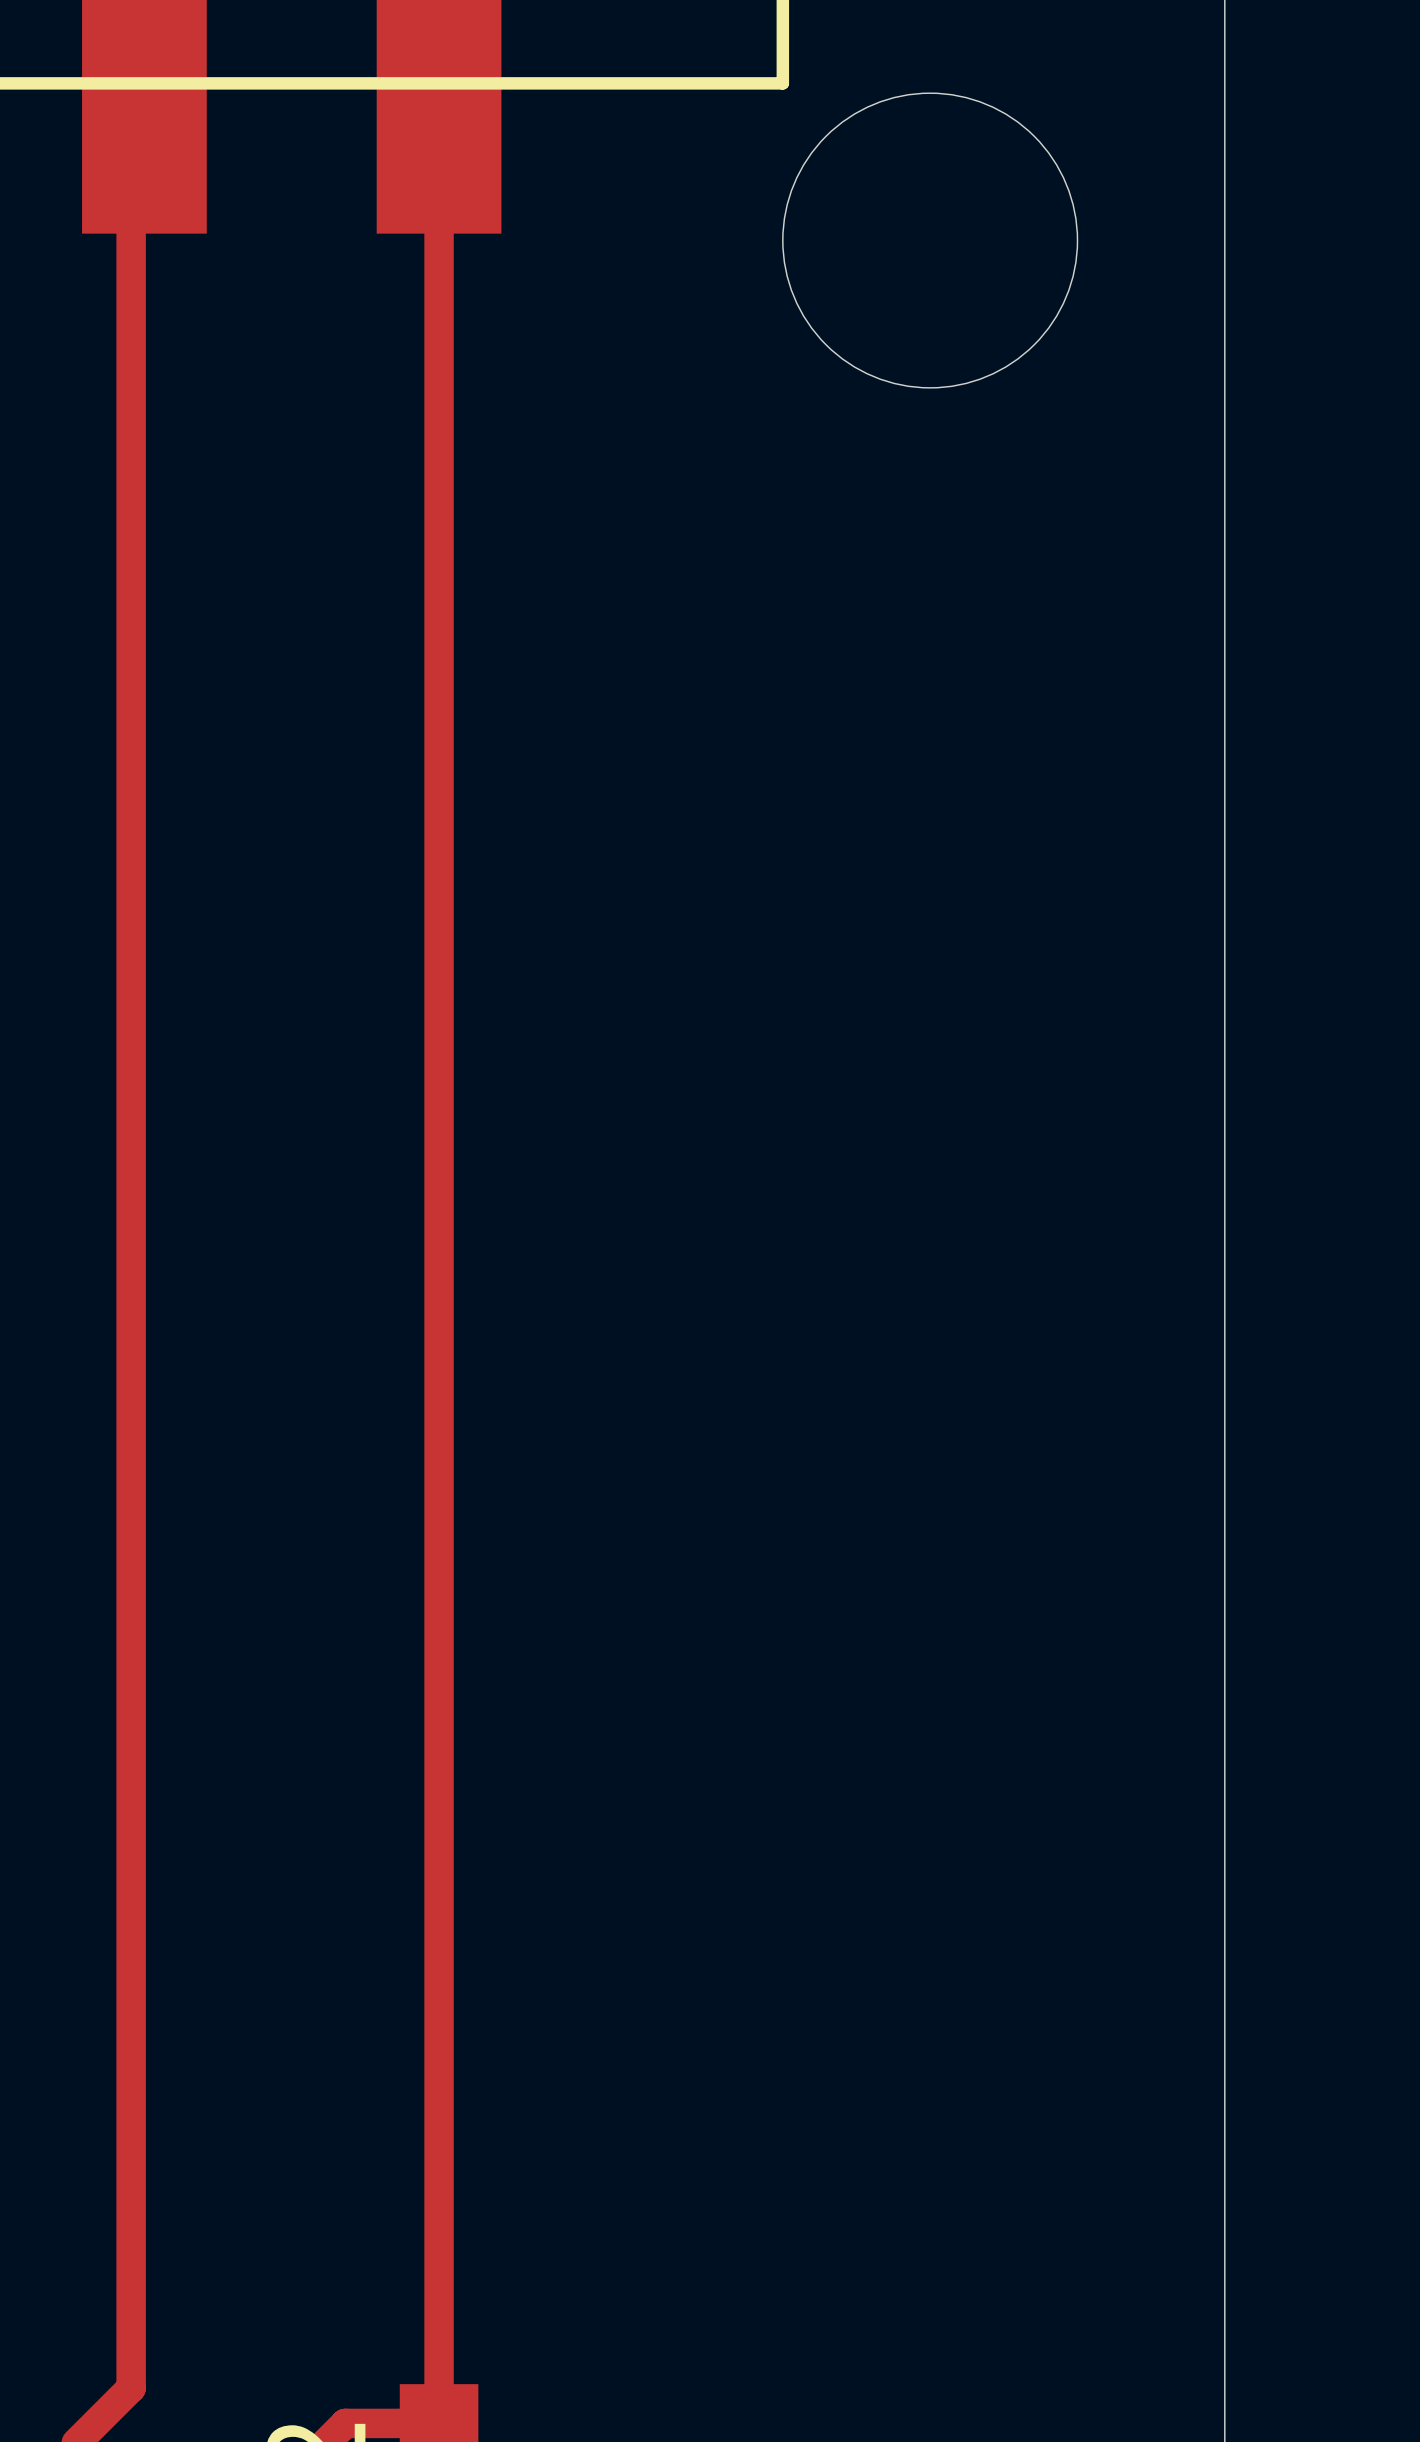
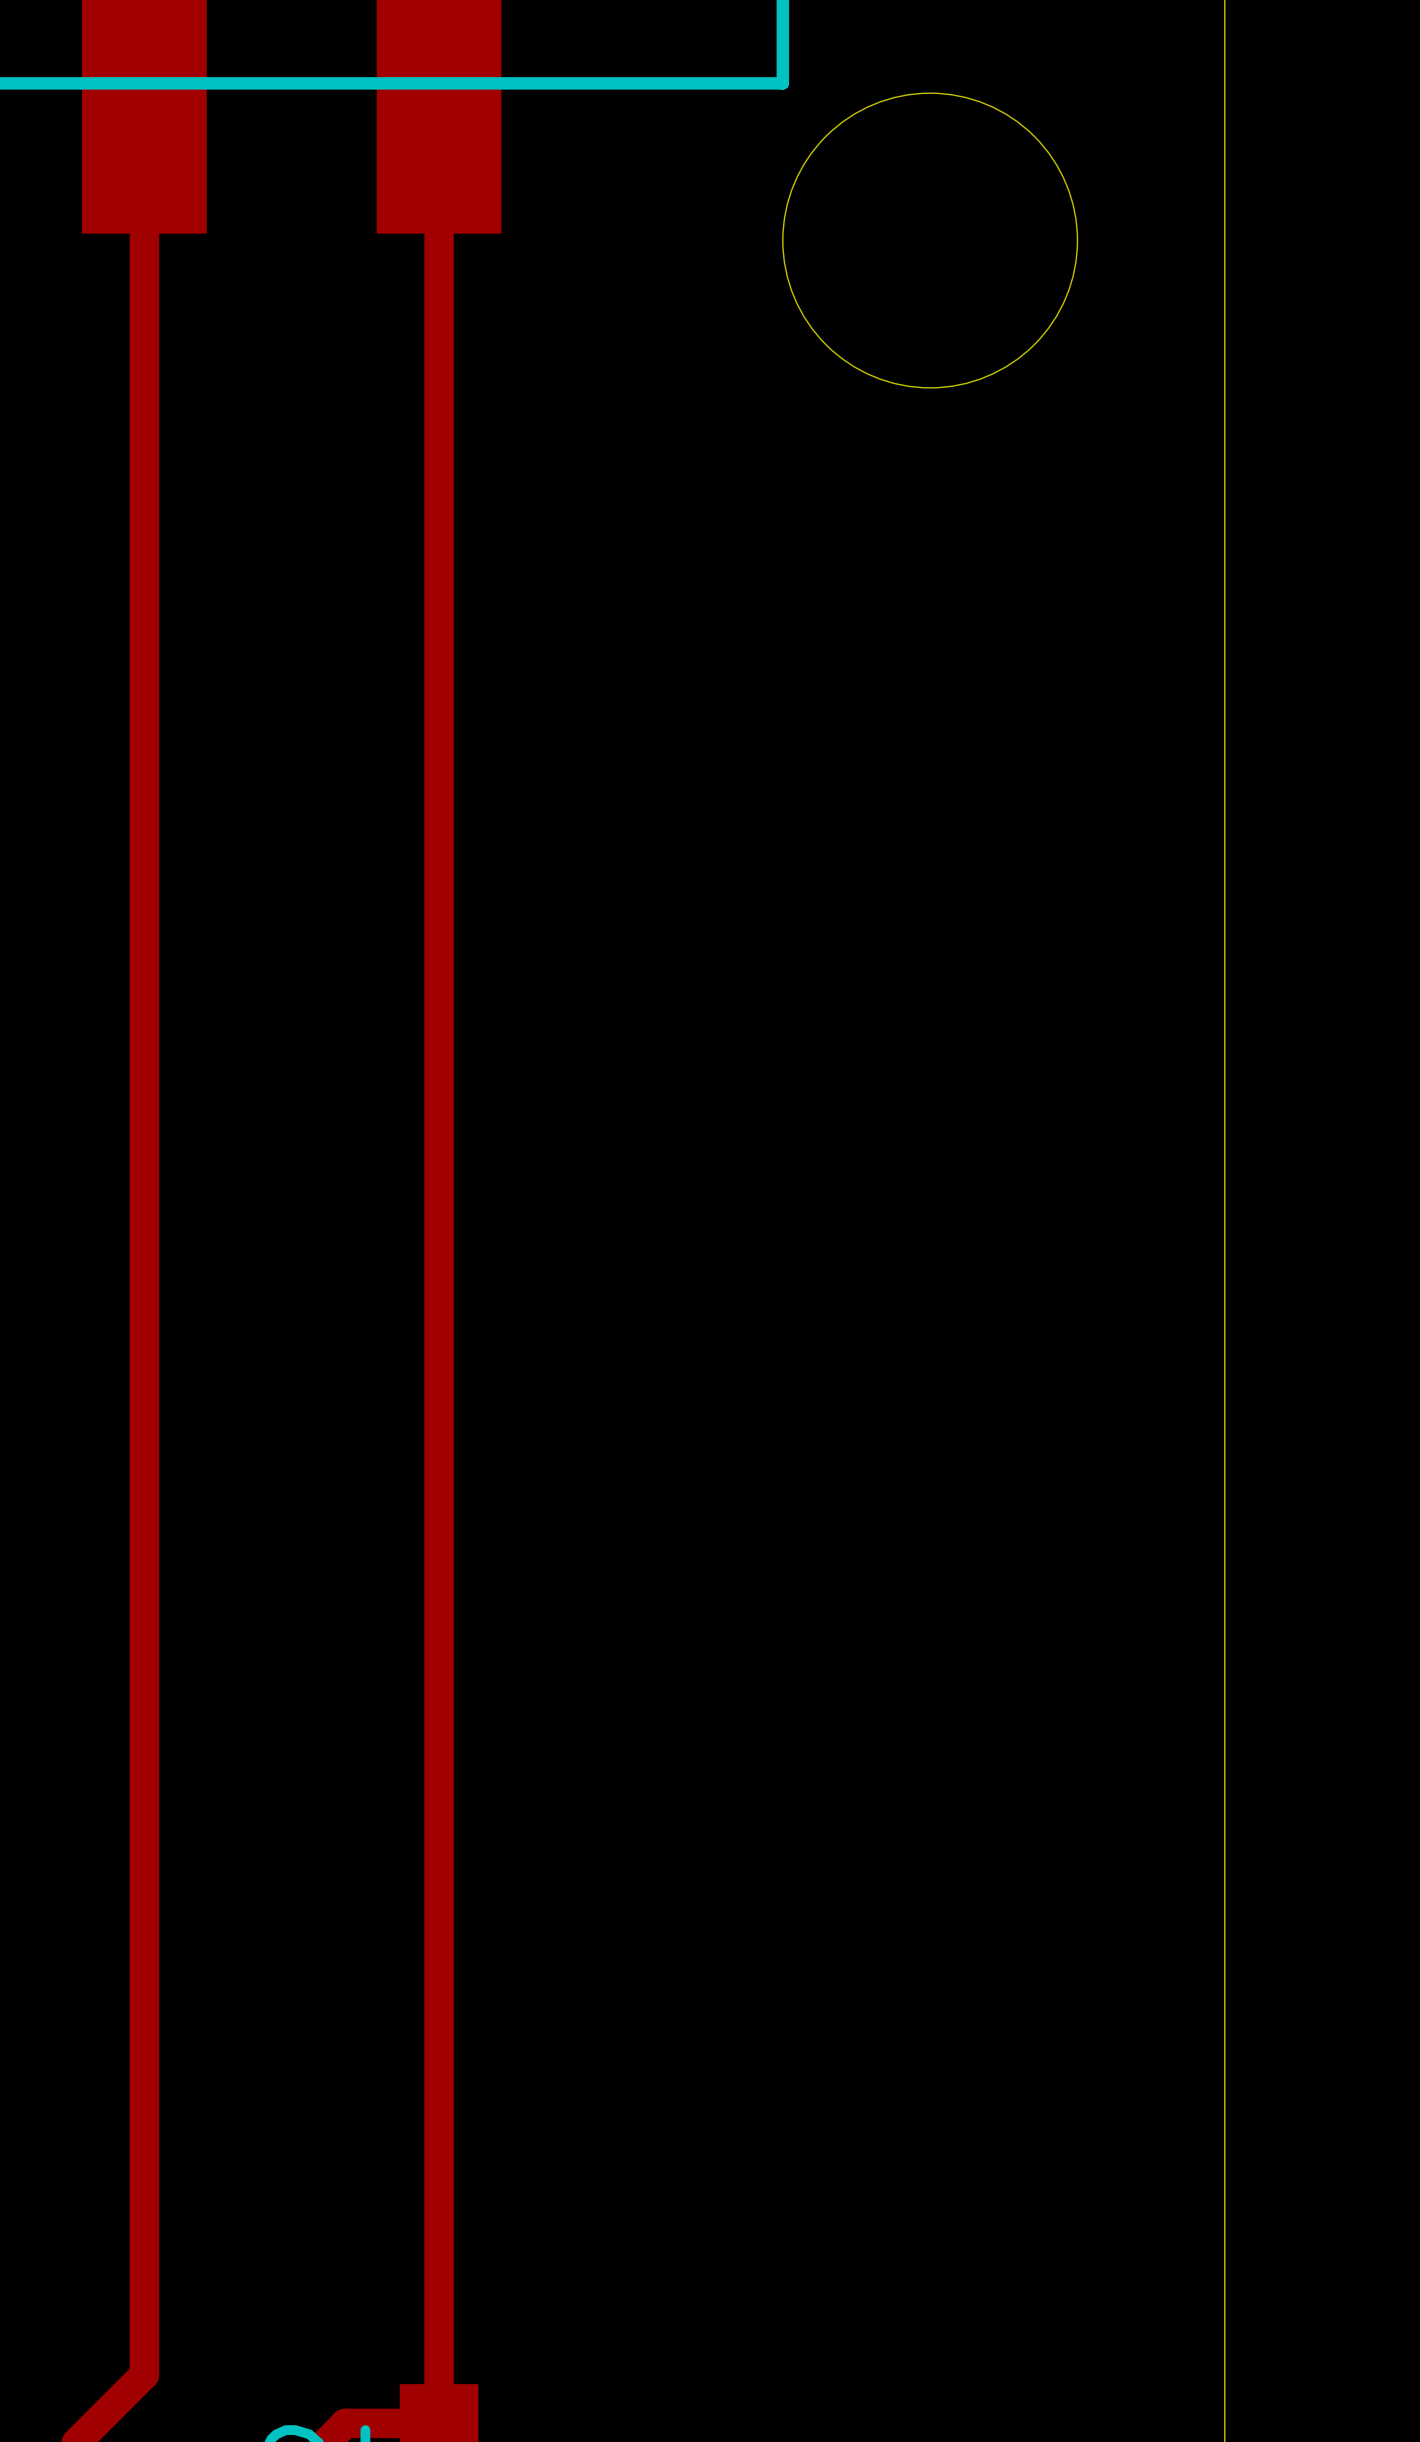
track: (144, 90) (131, 103) (131, 2388) -> (144, 90) (144, 2374) (131, 2388)

